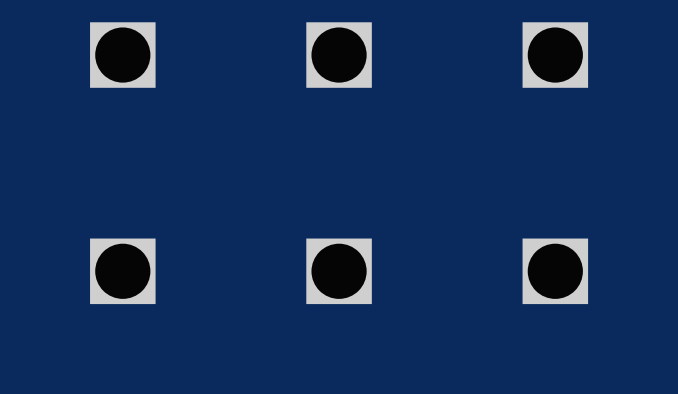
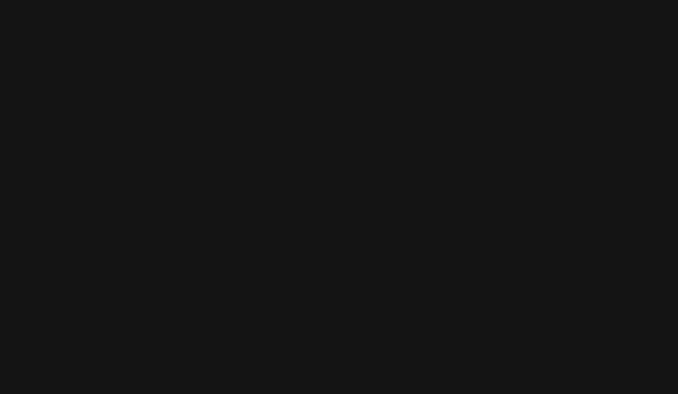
part: (122, 55) -> none
part: (339, 55) -> none
part: (555, 55) -> none
part: (122, 271) -> none
part: (339, 271) -> none
part: (555, 271) -> none

